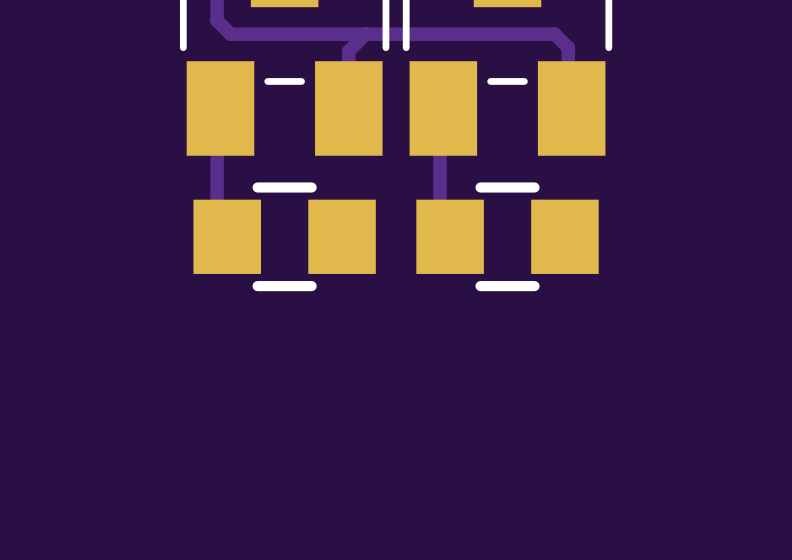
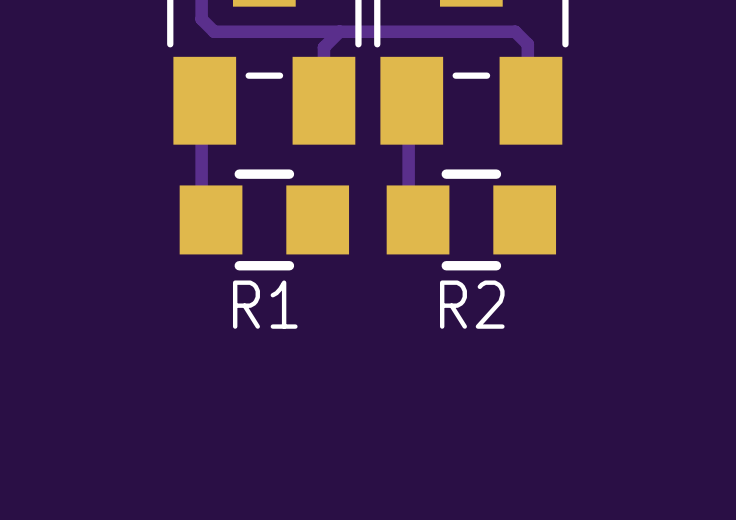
R1 name: none -> R1 (265, 304)
R2 name: none -> R2 (472, 304)

